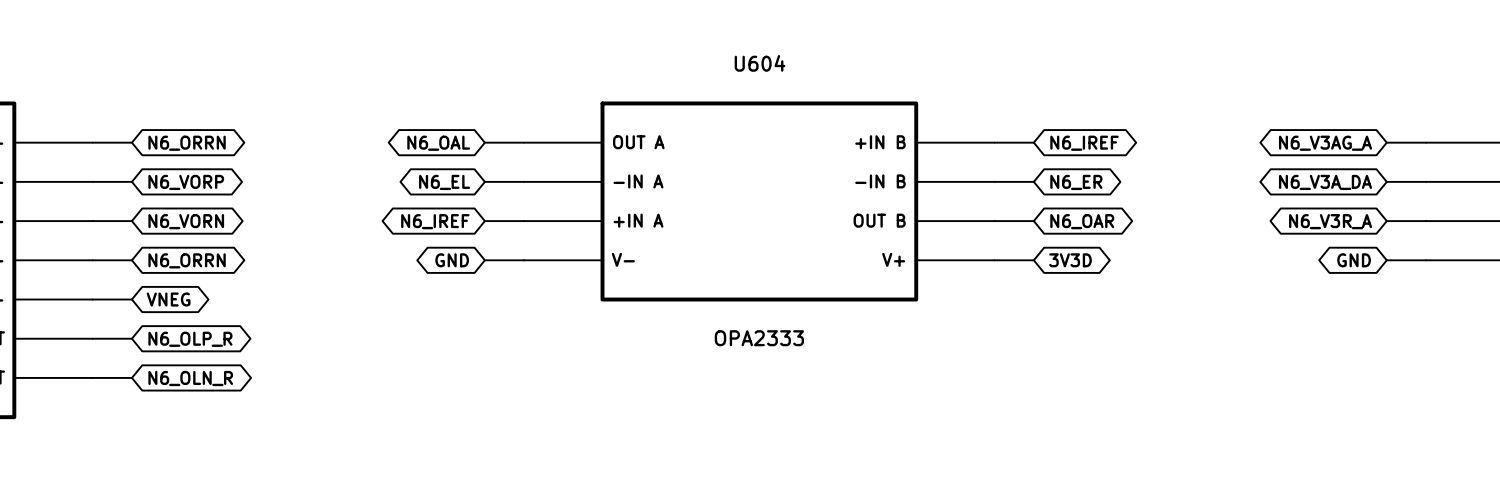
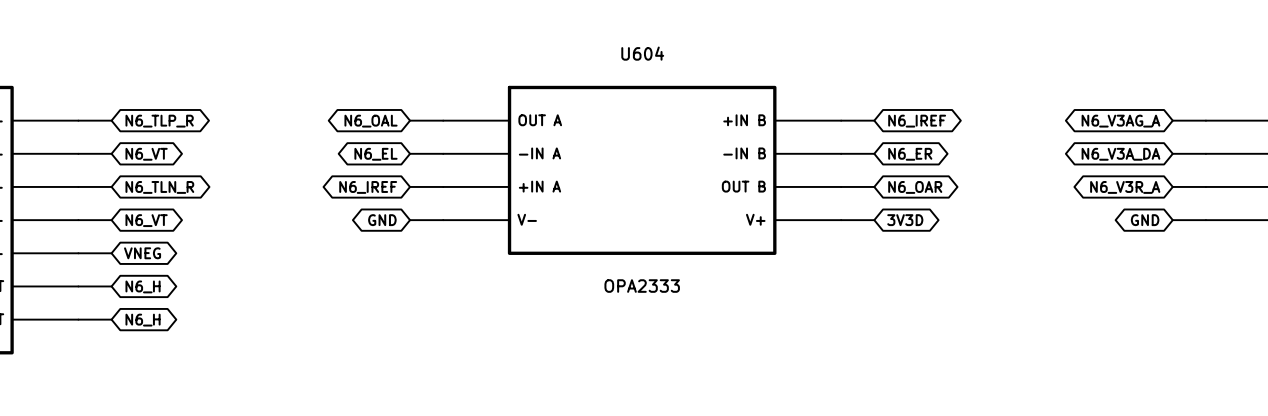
global label: N6_ORRN (187, 143) -> N6_TLP_R (159, 121)
global label: N6_VORP (186, 182) -> N6_VT (146, 154)
global label: N6_VORN (186, 221) -> N6_TLN_R (159, 187)
global label: N6_ORRN (187, 260) -> N6_VT (146, 220)
global label: N6_OLP_R (190, 339) -> N6_H (143, 286)
global label: N6_OLN_R (190, 378) -> N6_H (143, 320)

